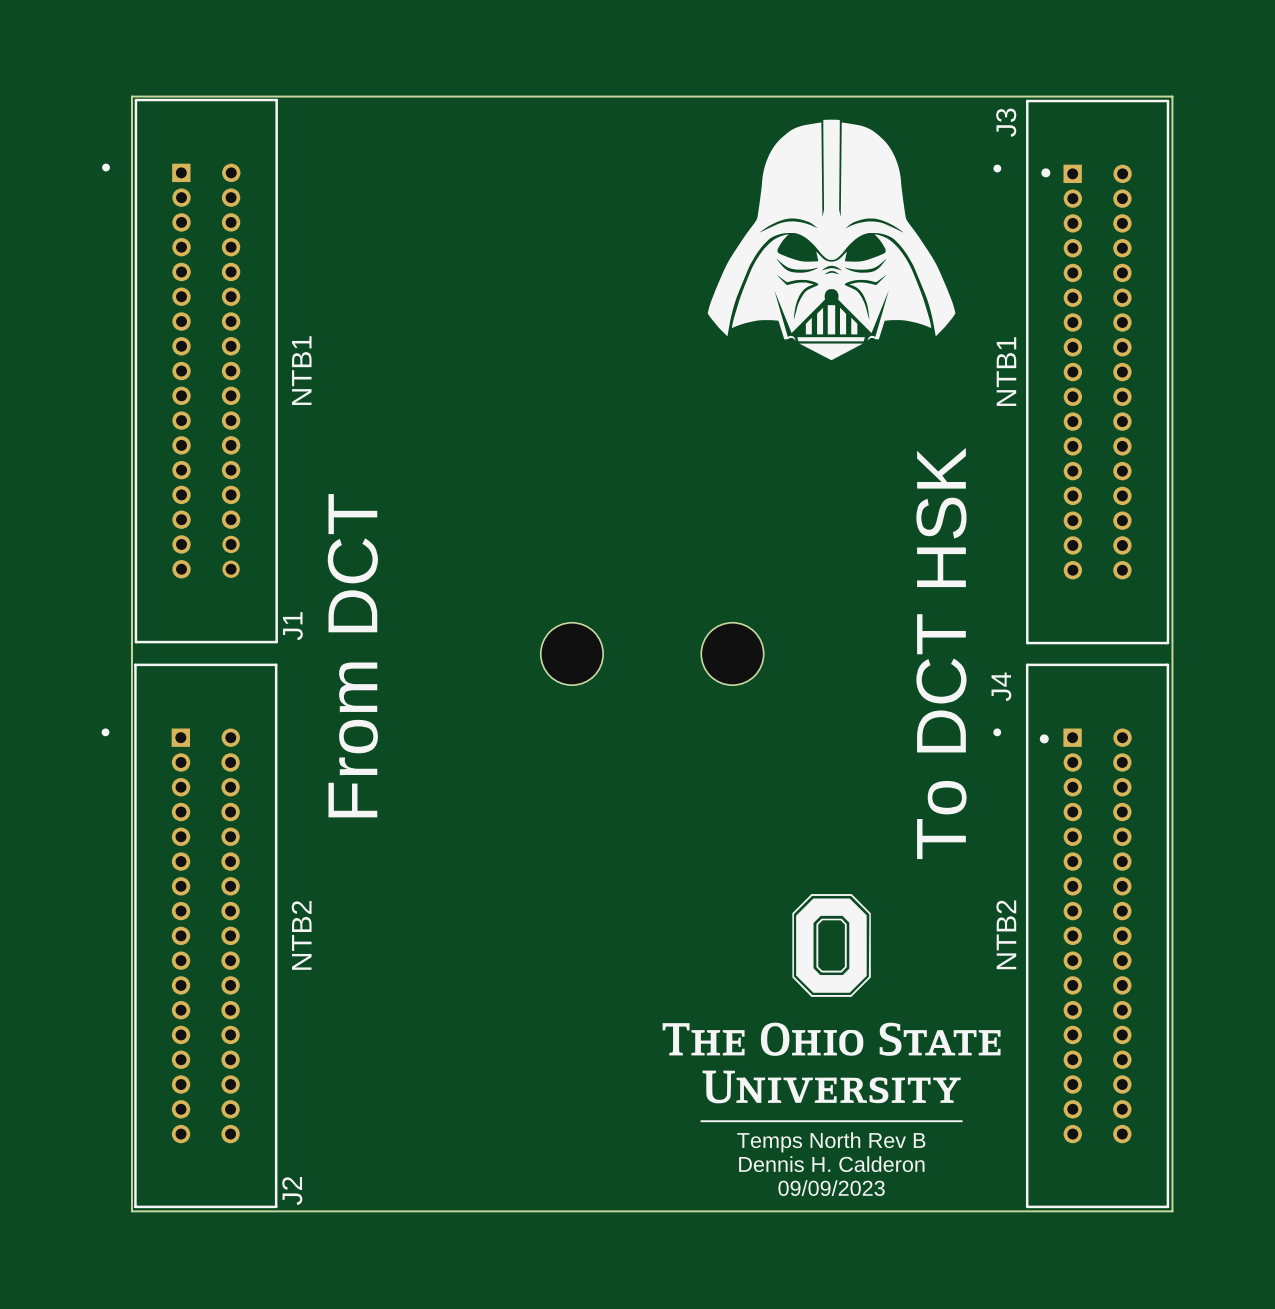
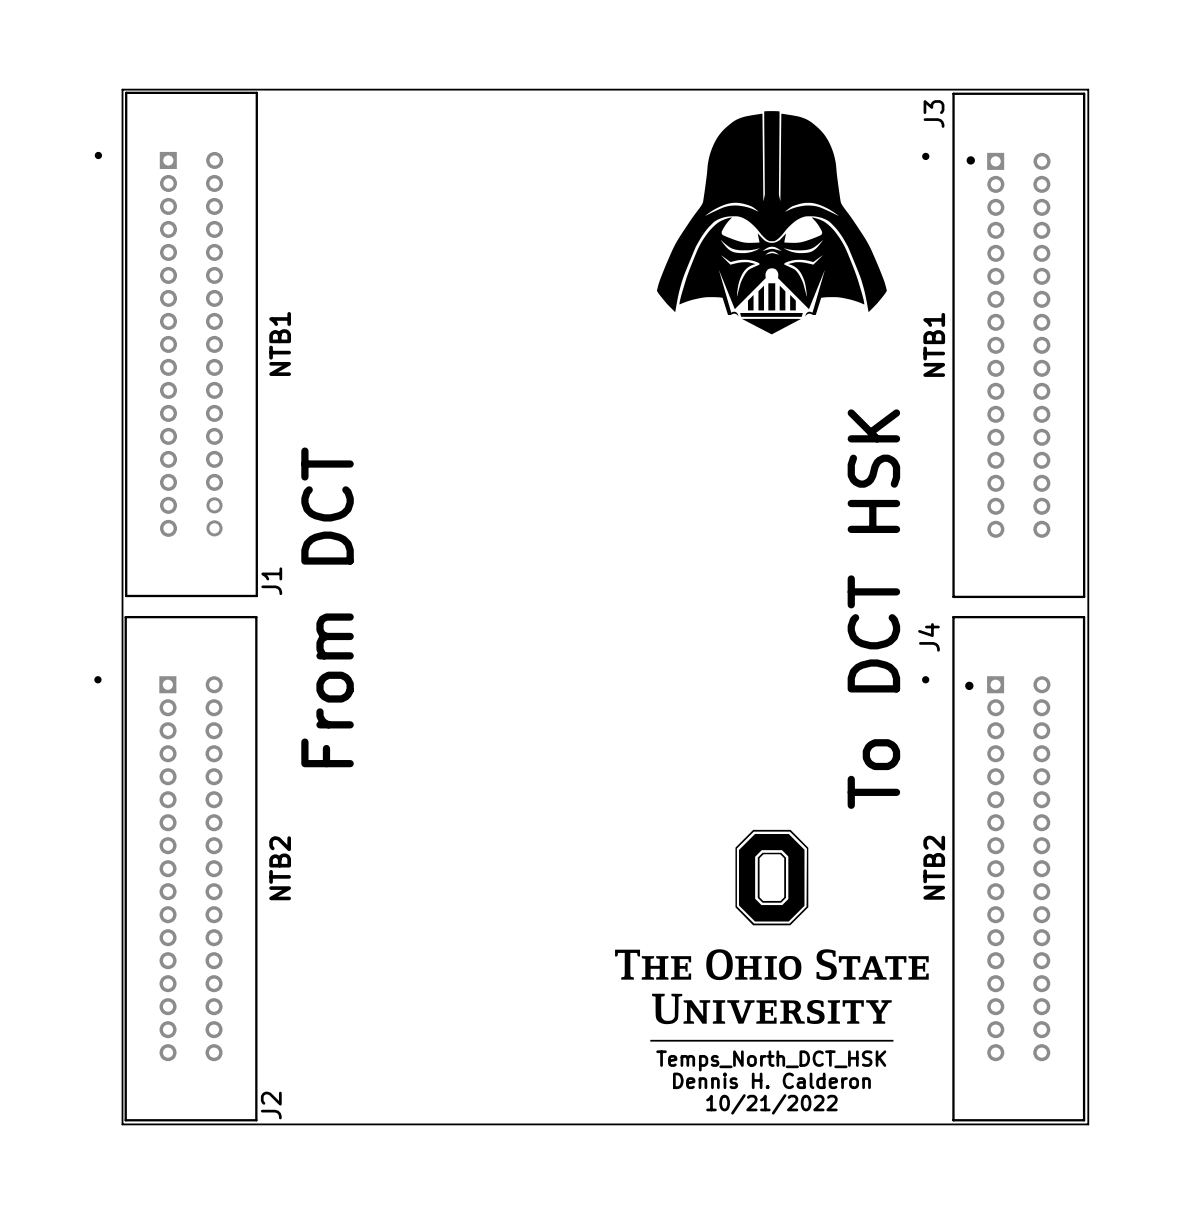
part: (571, 653) -> none
part: (732, 653) -> none
text: Temps North Rev B (831, 1142) -> Temps_North_DCT_HSK (771, 1060)
text: 09/09/2023 (831, 1188) -> 10/21/2022 (771, 1104)

